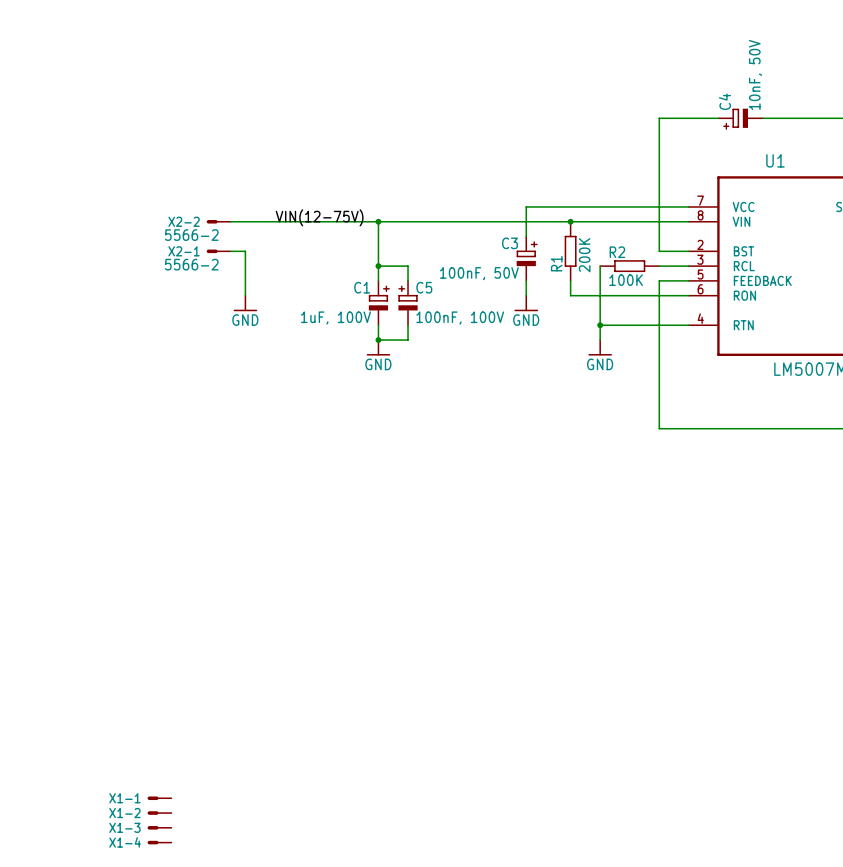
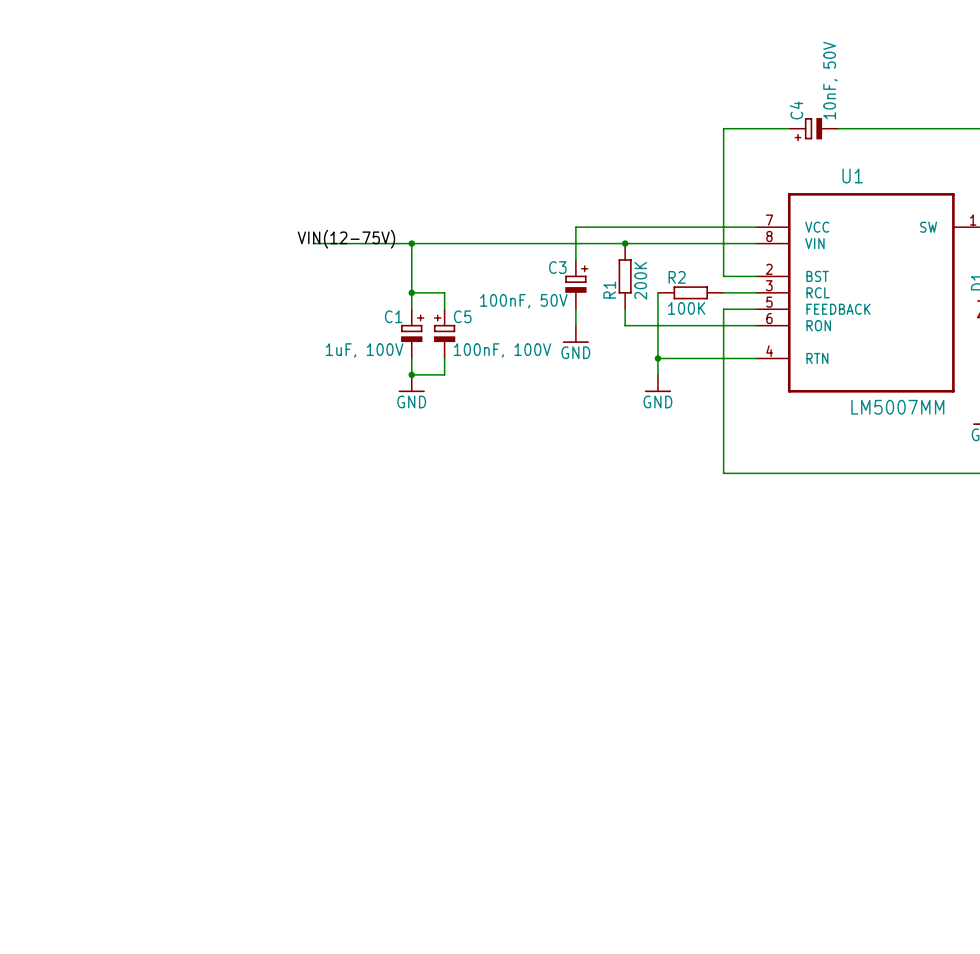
X2-2: 5566-2 (218, 221) -> none
wire: (230, 221) (289, 221) -> none
X2-1: 5566-2 (218, 251) -> none
wire: (230, 251) (245, 251) (245, 295) -> none
power symbol: GND (245, 303) -> none
X1-1: (159, 798) -> none
X1-2: (159, 813) -> none
X1-3: (159, 827) -> none
X1-4: (159, 842) -> none

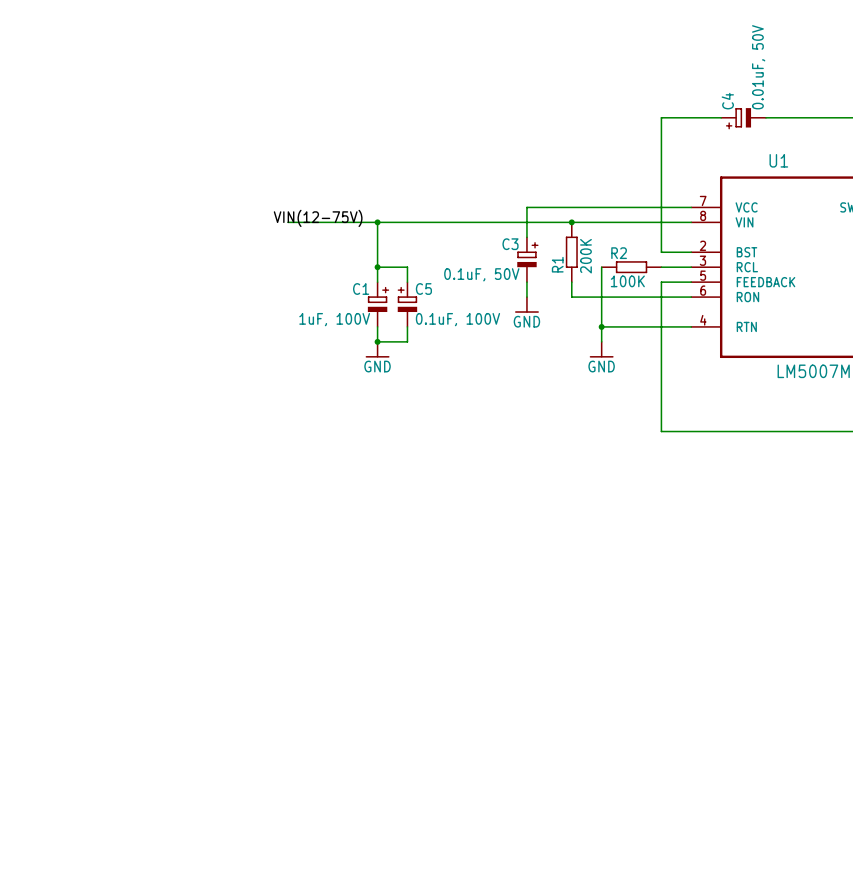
C4 value: 10nF, 50V (830, 80) -> 0.01uF, 50V (758, 67)
C3 value: 100nF, 50V (523, 301) -> 0.1uF, 50V (481, 274)
C5 value: 100nF, 100V (502, 350) -> 0.1uF, 100V (457, 319)

